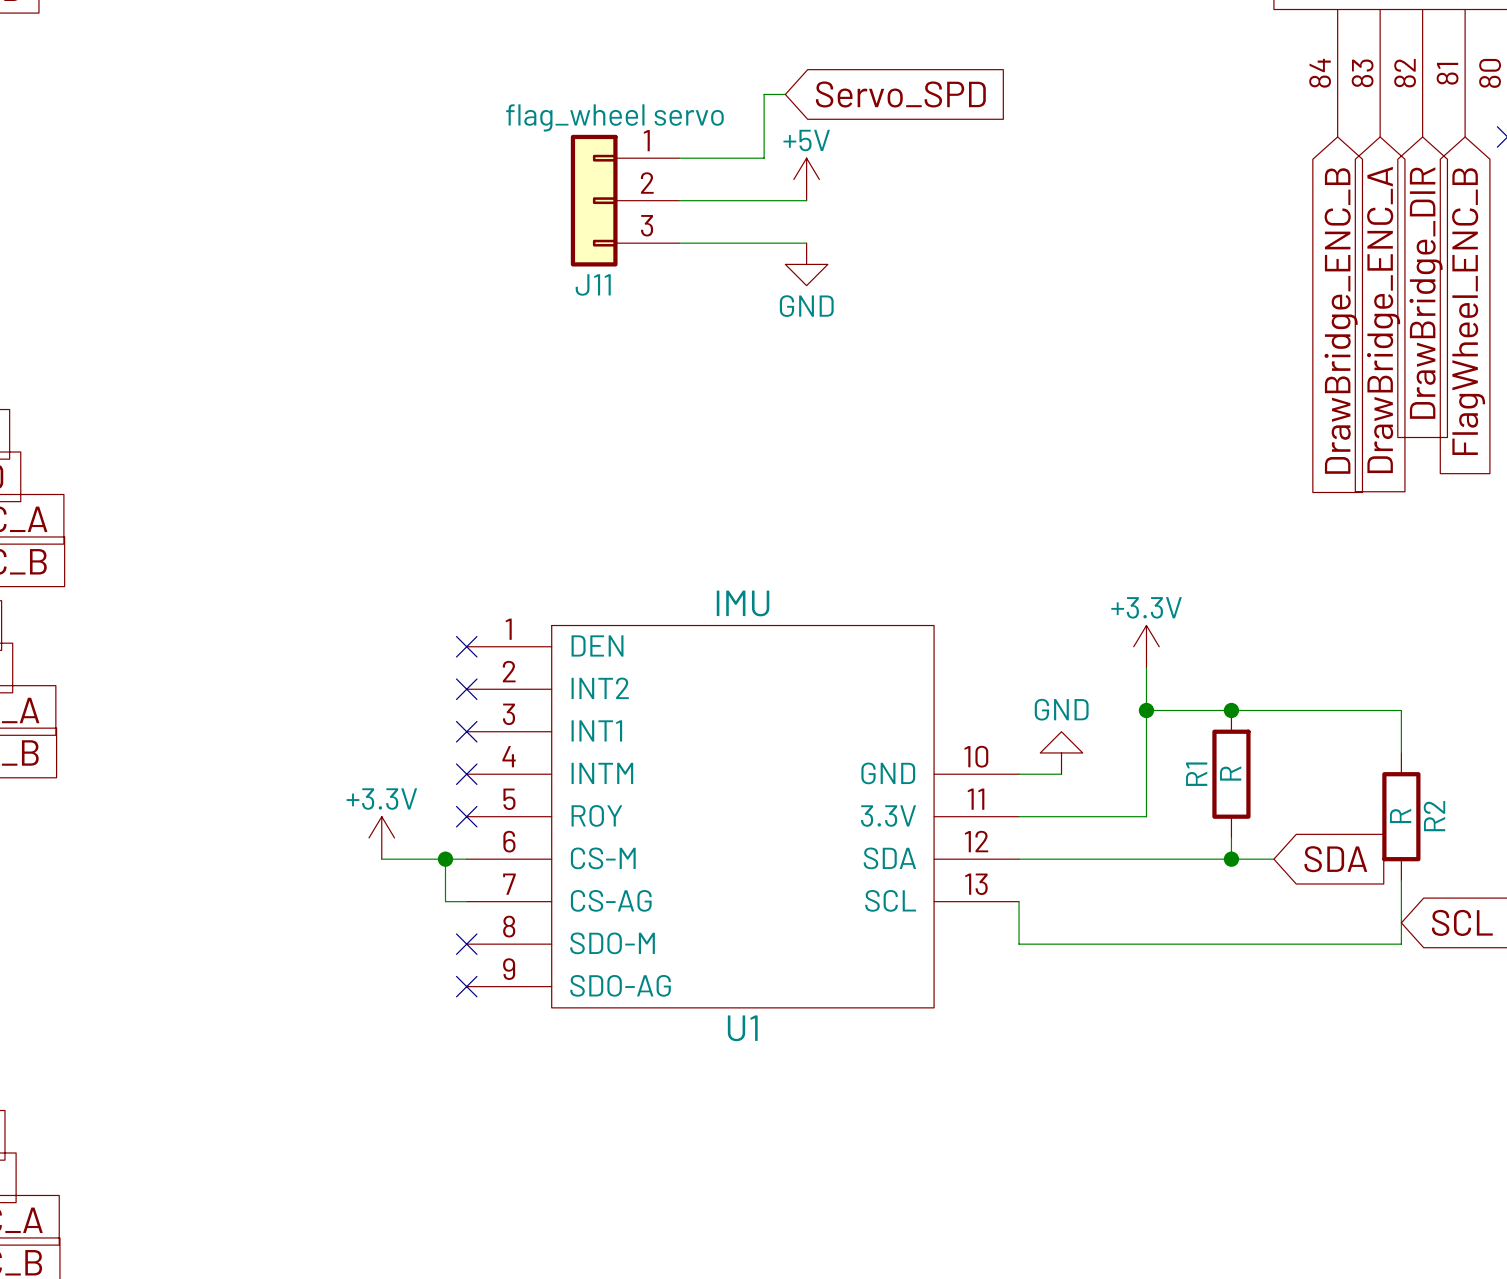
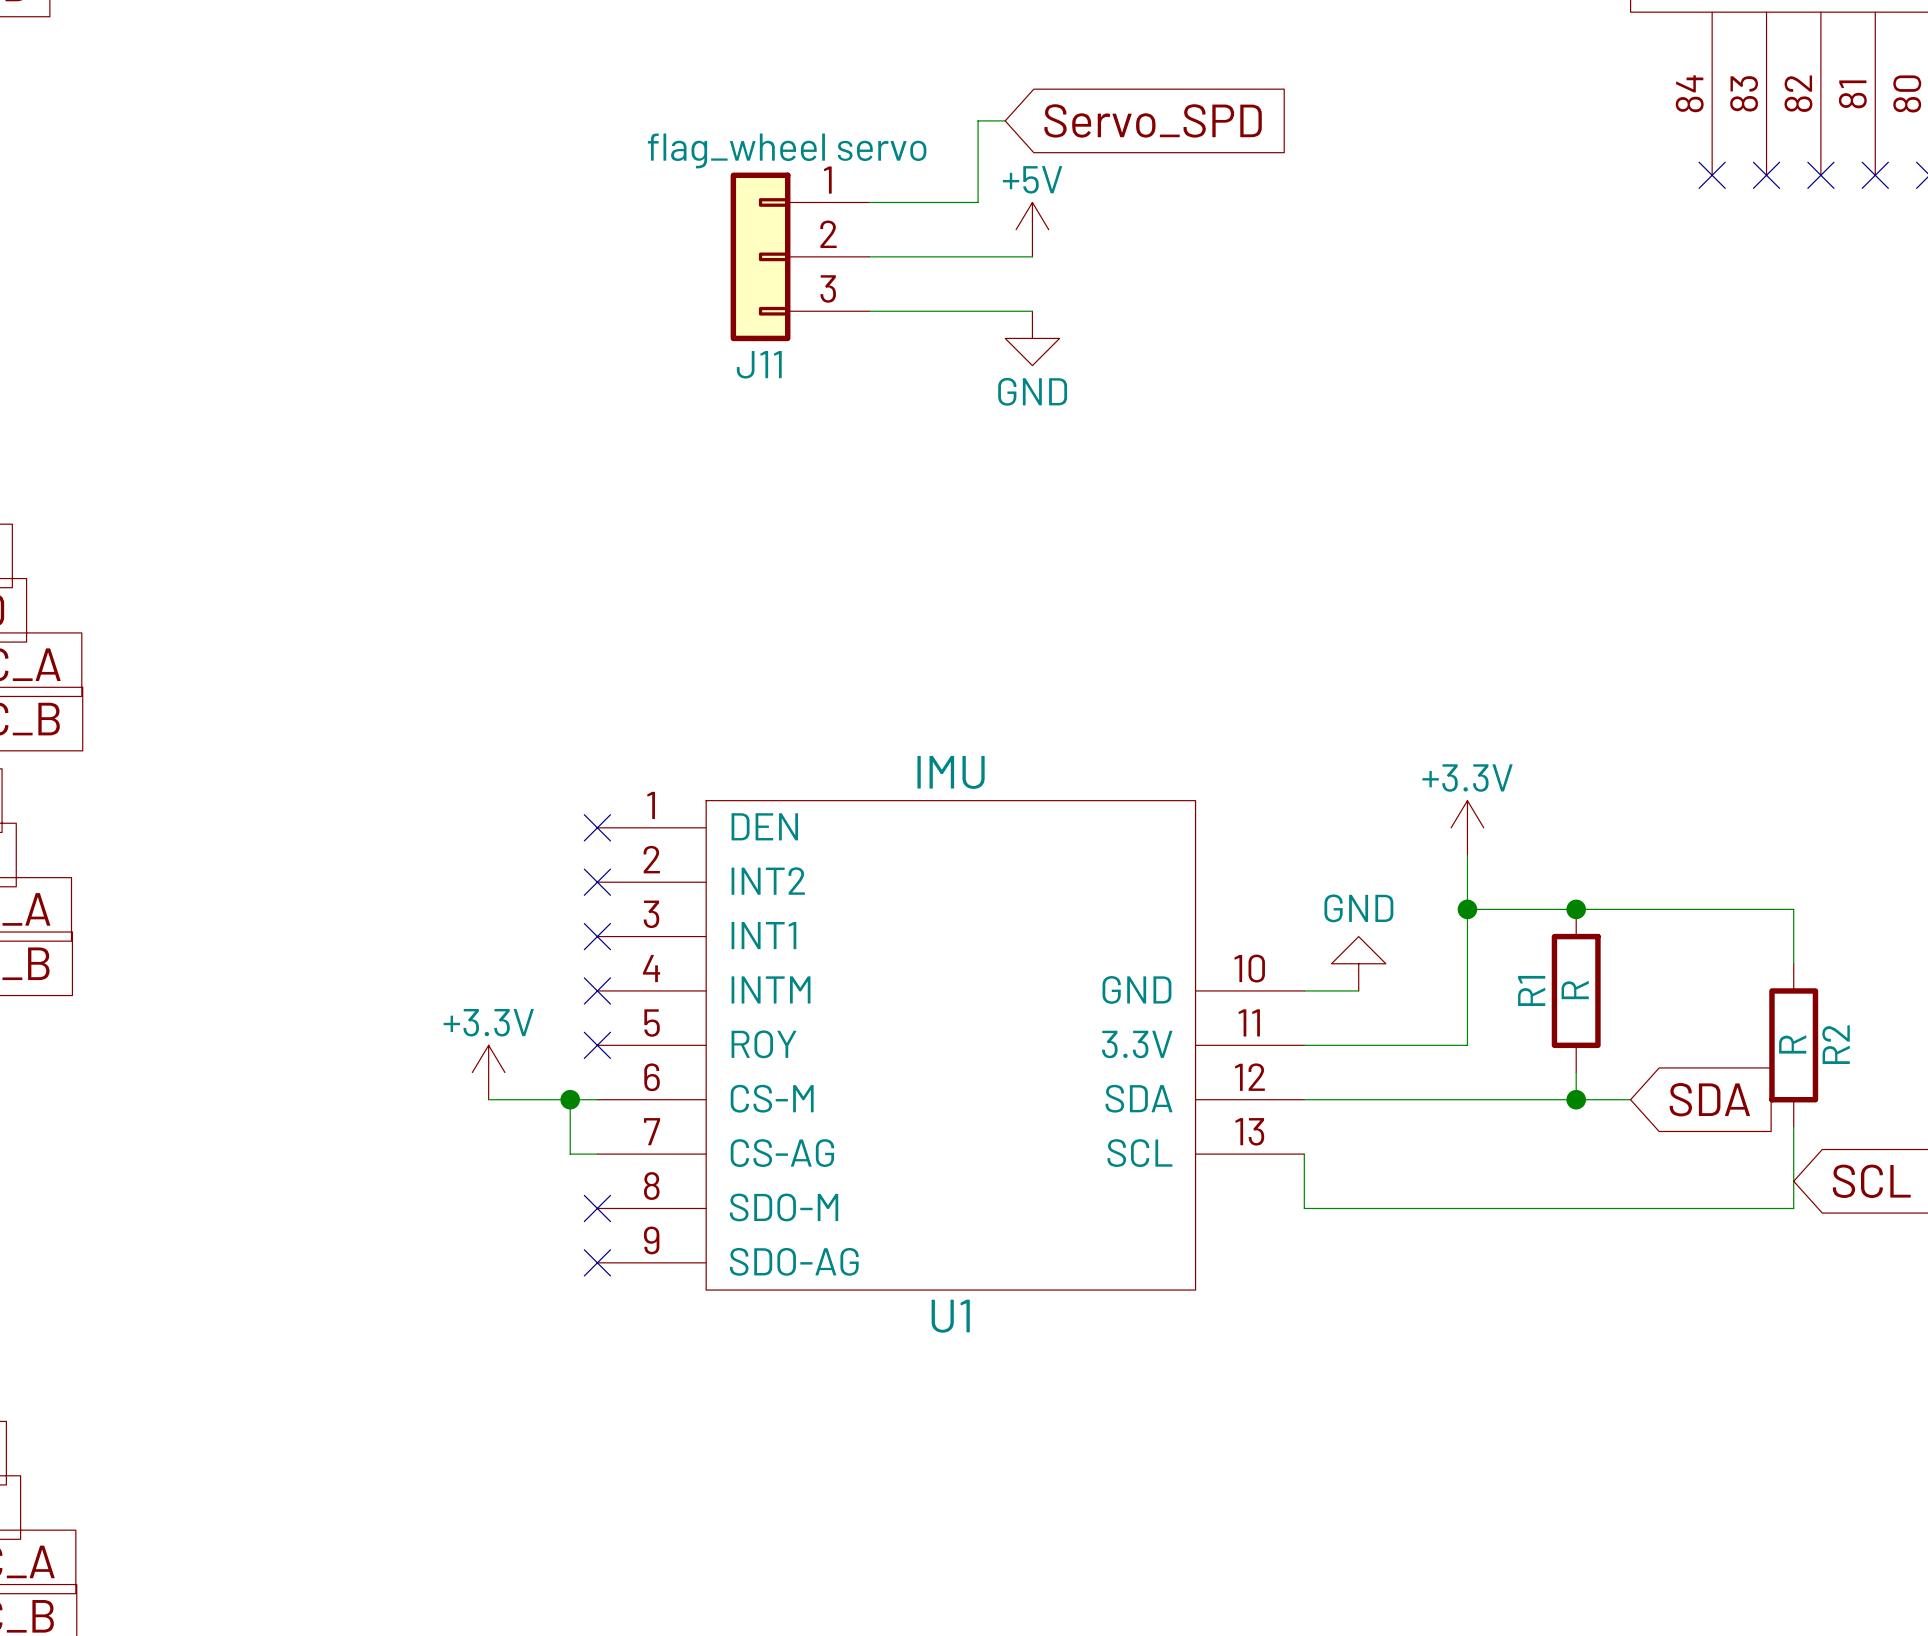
no-connect mark: none -> (1712, 175)
no-connect mark: none -> (1766, 175)
no-connect mark: none -> (1820, 175)
no-connect mark: none -> (1875, 175)
global label: DrawBridge_DIR (1426, 293) -> none
global label: FlagWheel_ENC_B (1468, 311) -> none
global label: DrawBridge_ENC_A (1383, 319) -> none
global label: DrawBridge_ENC_B (1341, 321) -> none

